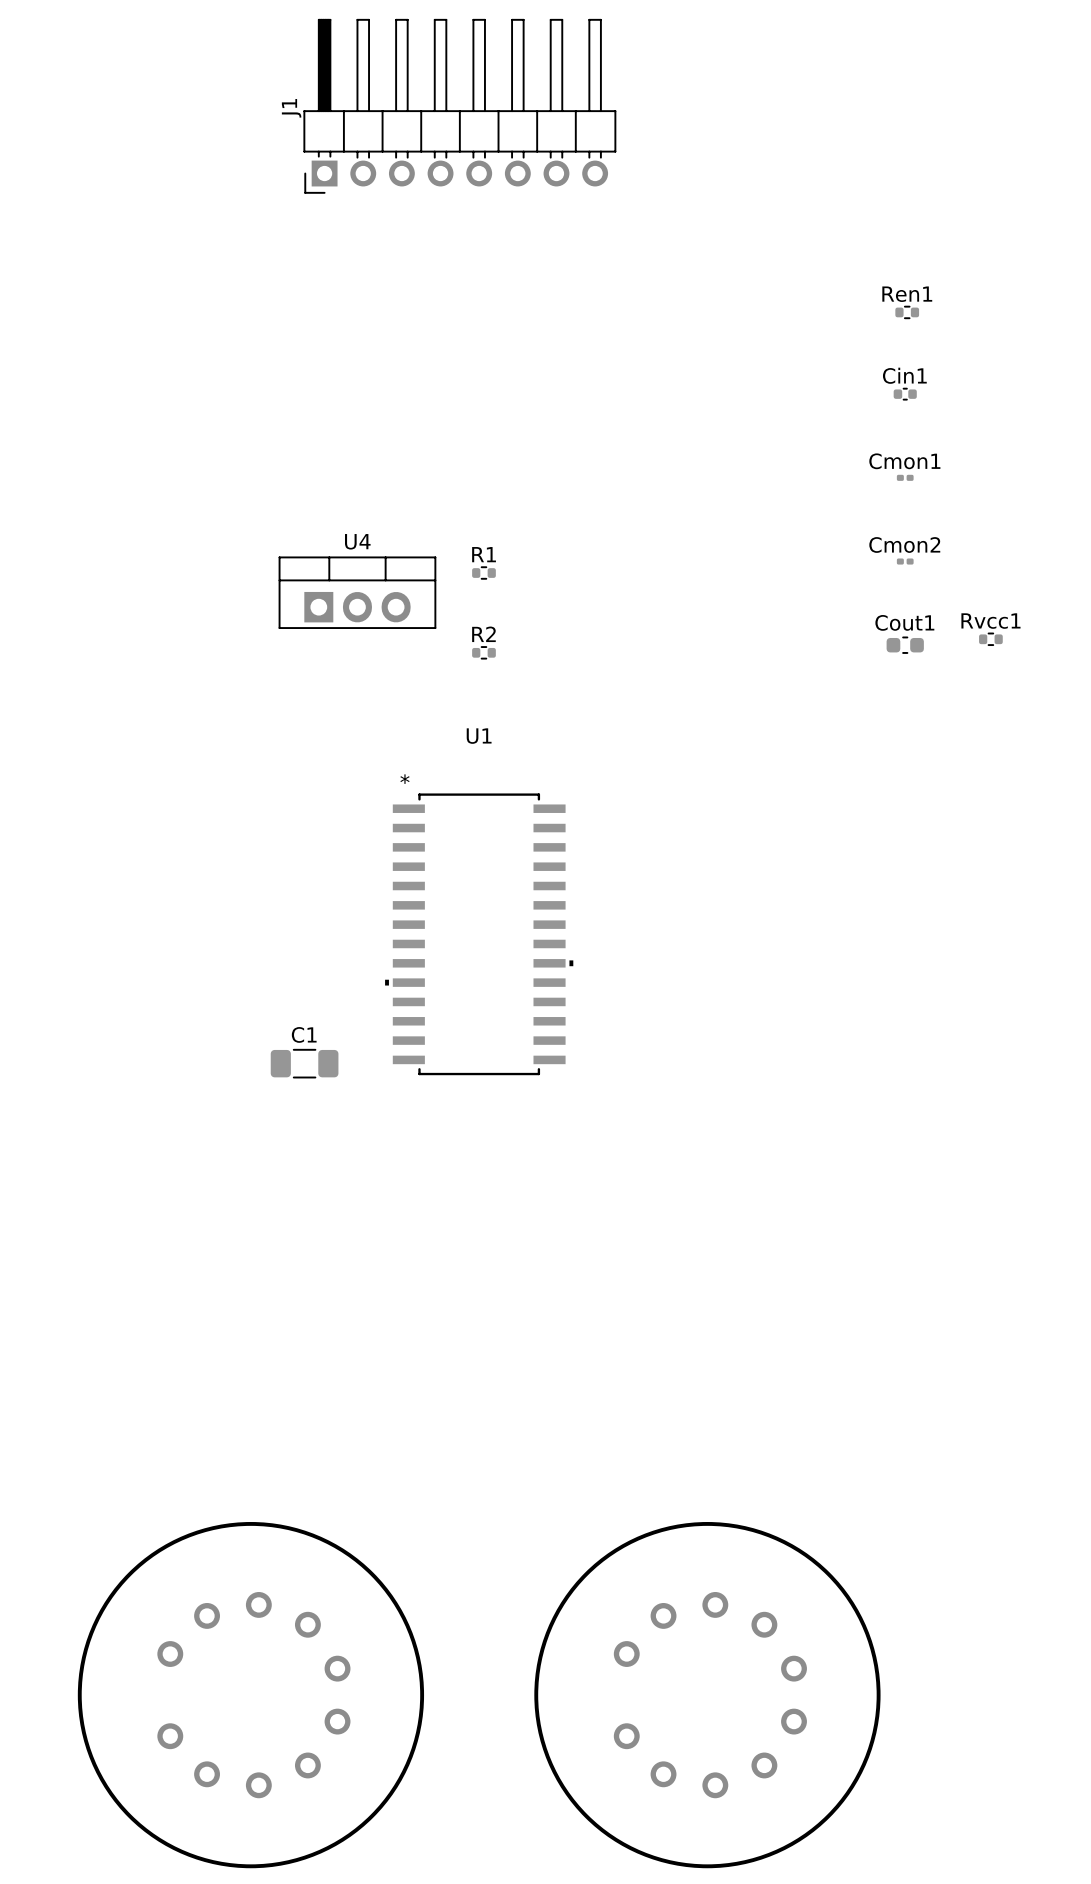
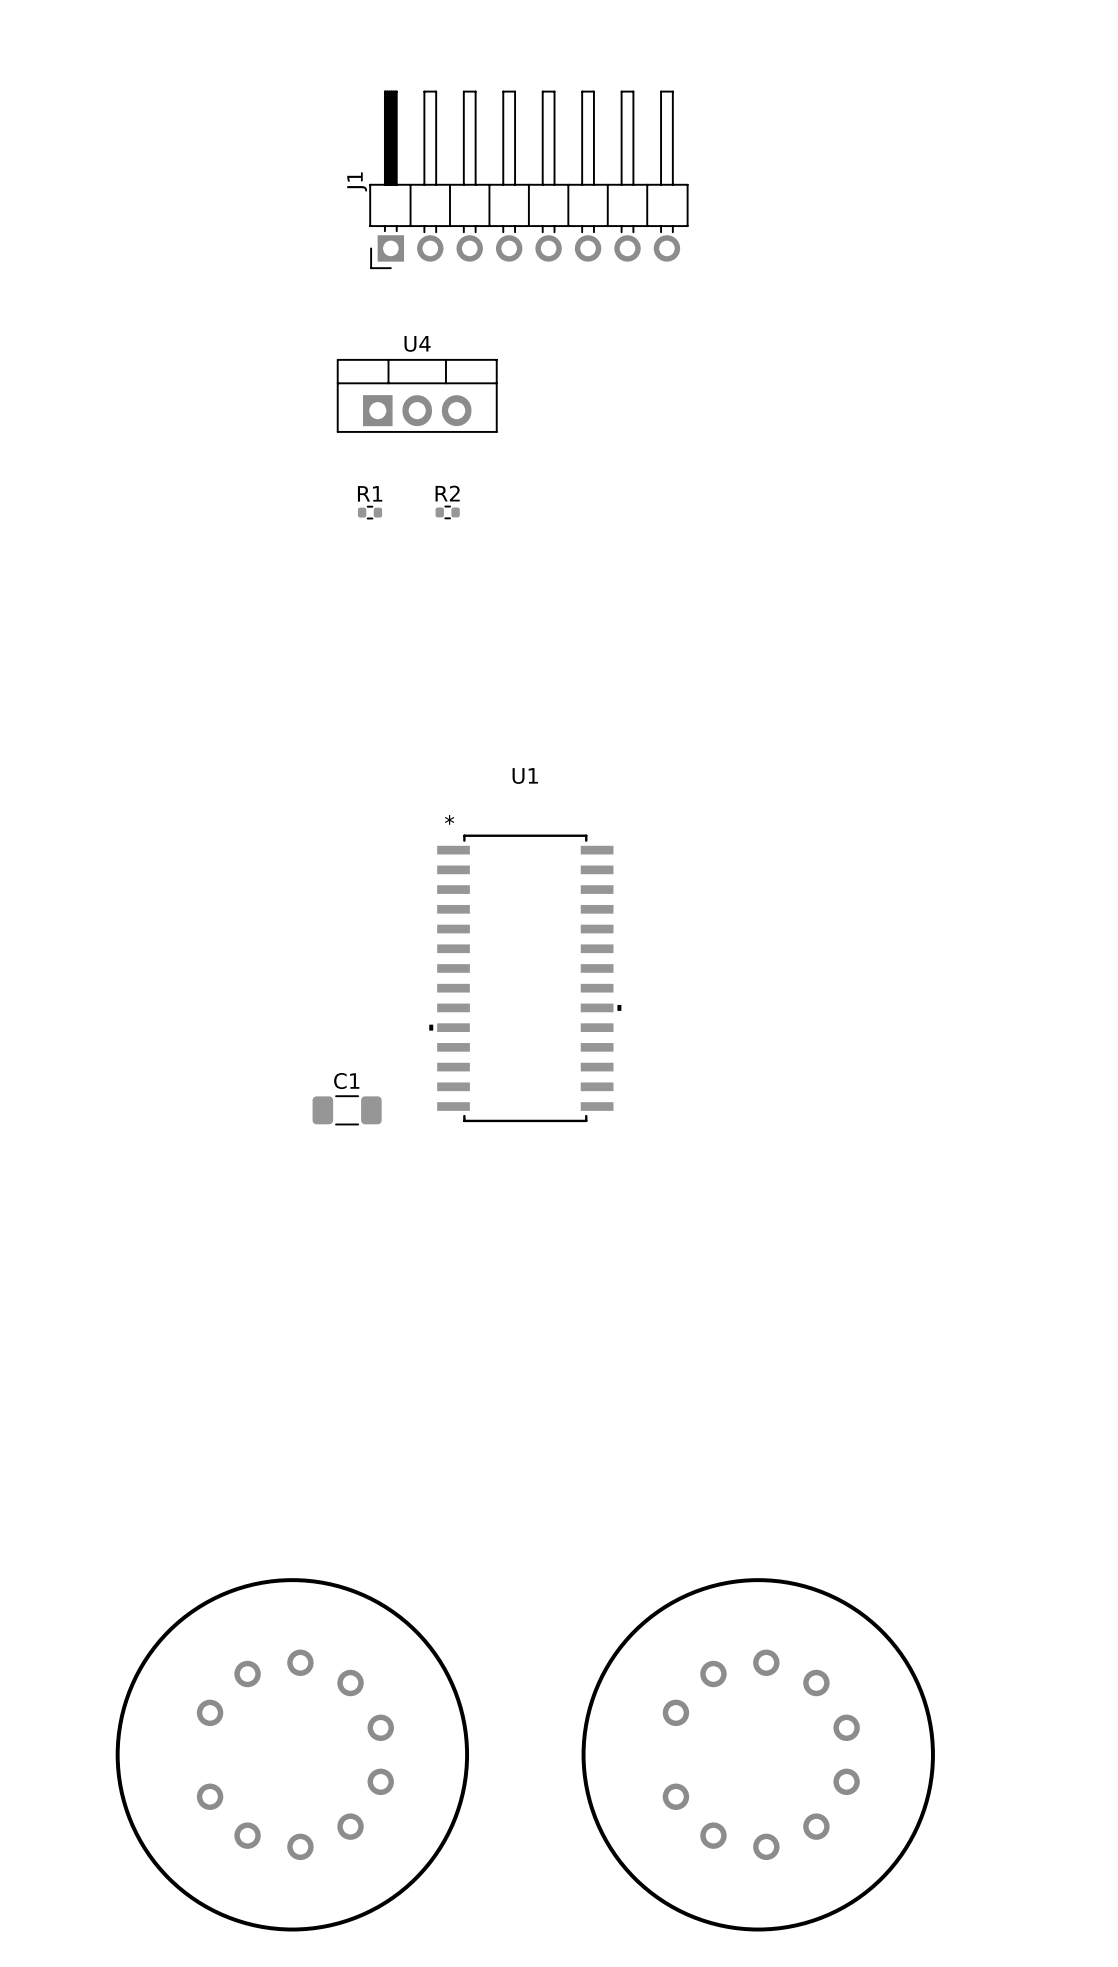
J1 position: (459, 106) -> (528, 179)
Ren1: (907, 312) -> none
Cin1: (905, 394) -> none
Cmon1: (905, 477) -> none
Cmon2: (905, 561) -> none
R1 position: (483, 573) -> (370, 512)
U4 position: (357, 592) -> (417, 395)
Rvcc1: (990, 639) -> none
Cout1: (905, 645) -> none
R2 position: (483, 652) -> (447, 512)

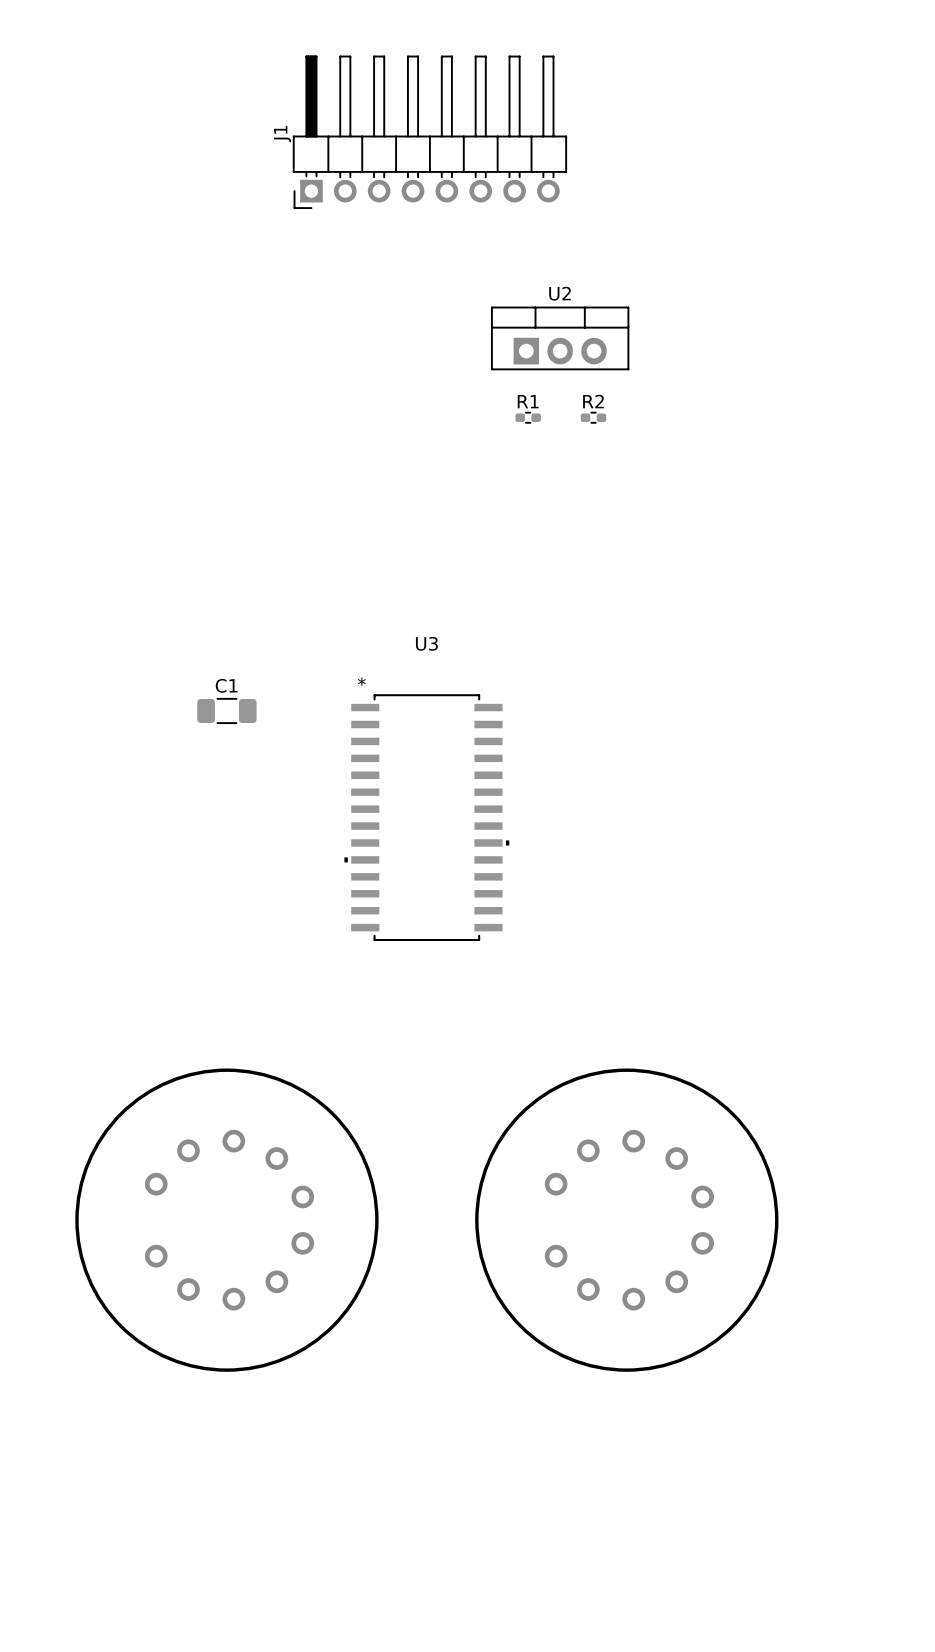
U4: (417, 395) -> none
U2: none -> (560, 338)
R1 footprint: [357, 505, 383, 520] -> [515, 411, 541, 424]
R2 footprint: [435, 505, 460, 520] -> [580, 411, 607, 424]
U1 name: U1 (525, 776) -> U3 (426, 643)
C1 position: (347, 1110) -> (226, 710)
part: none -> (226, 1220)
part: none -> (626, 1220)
part: (292, 1754) -> none
part: (758, 1754) -> none

